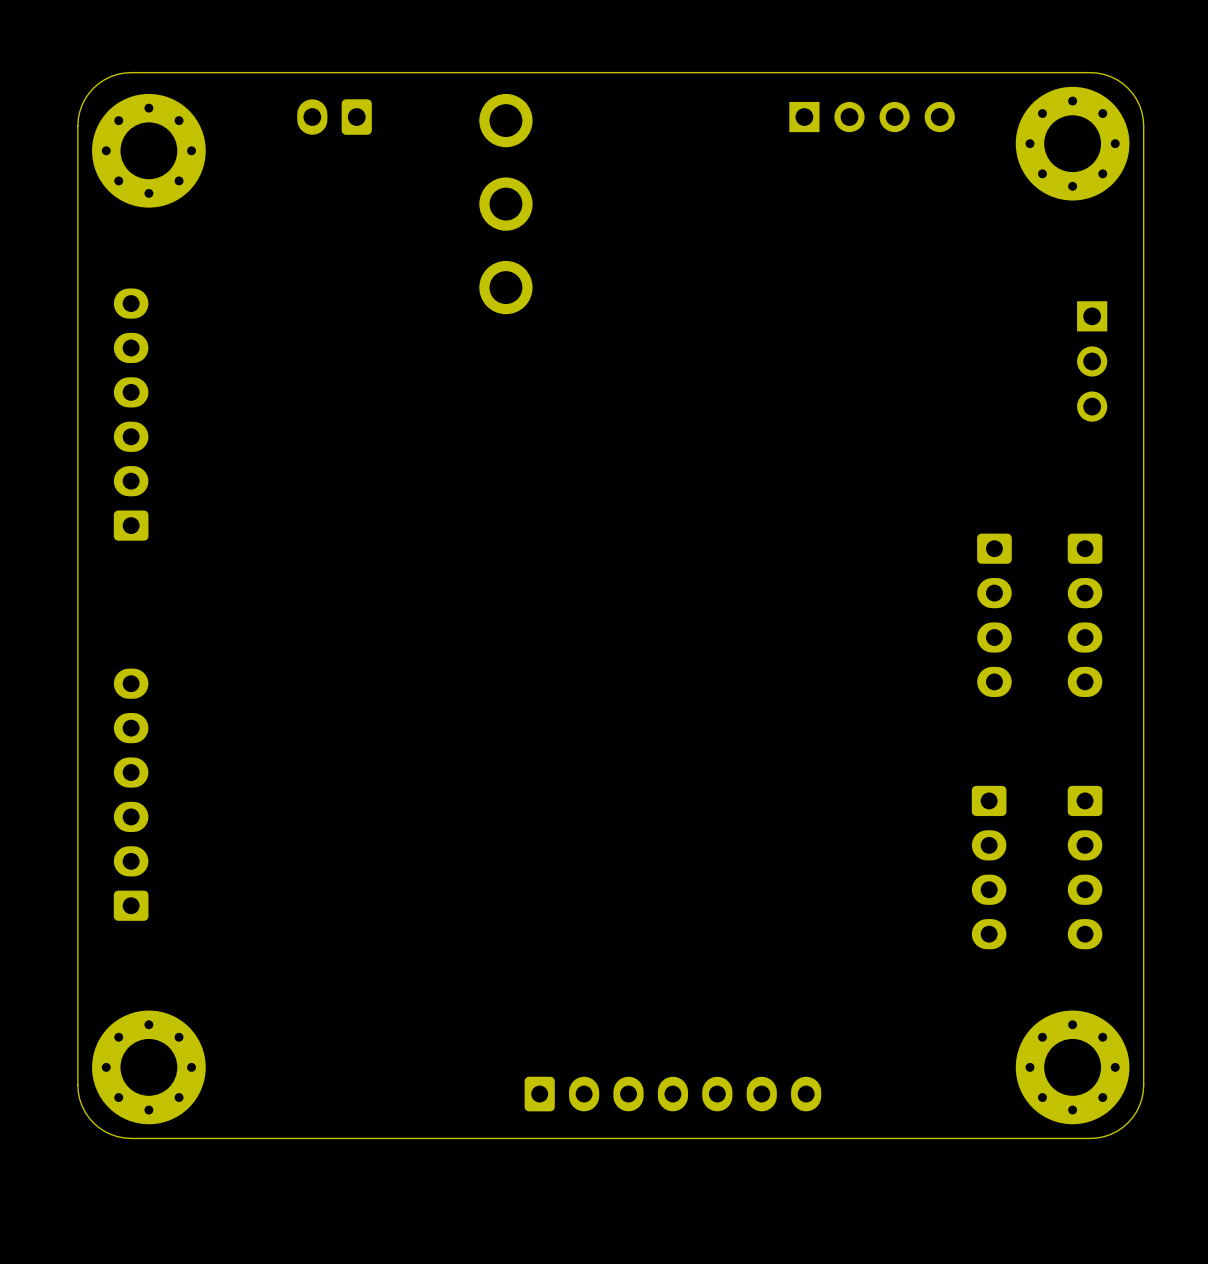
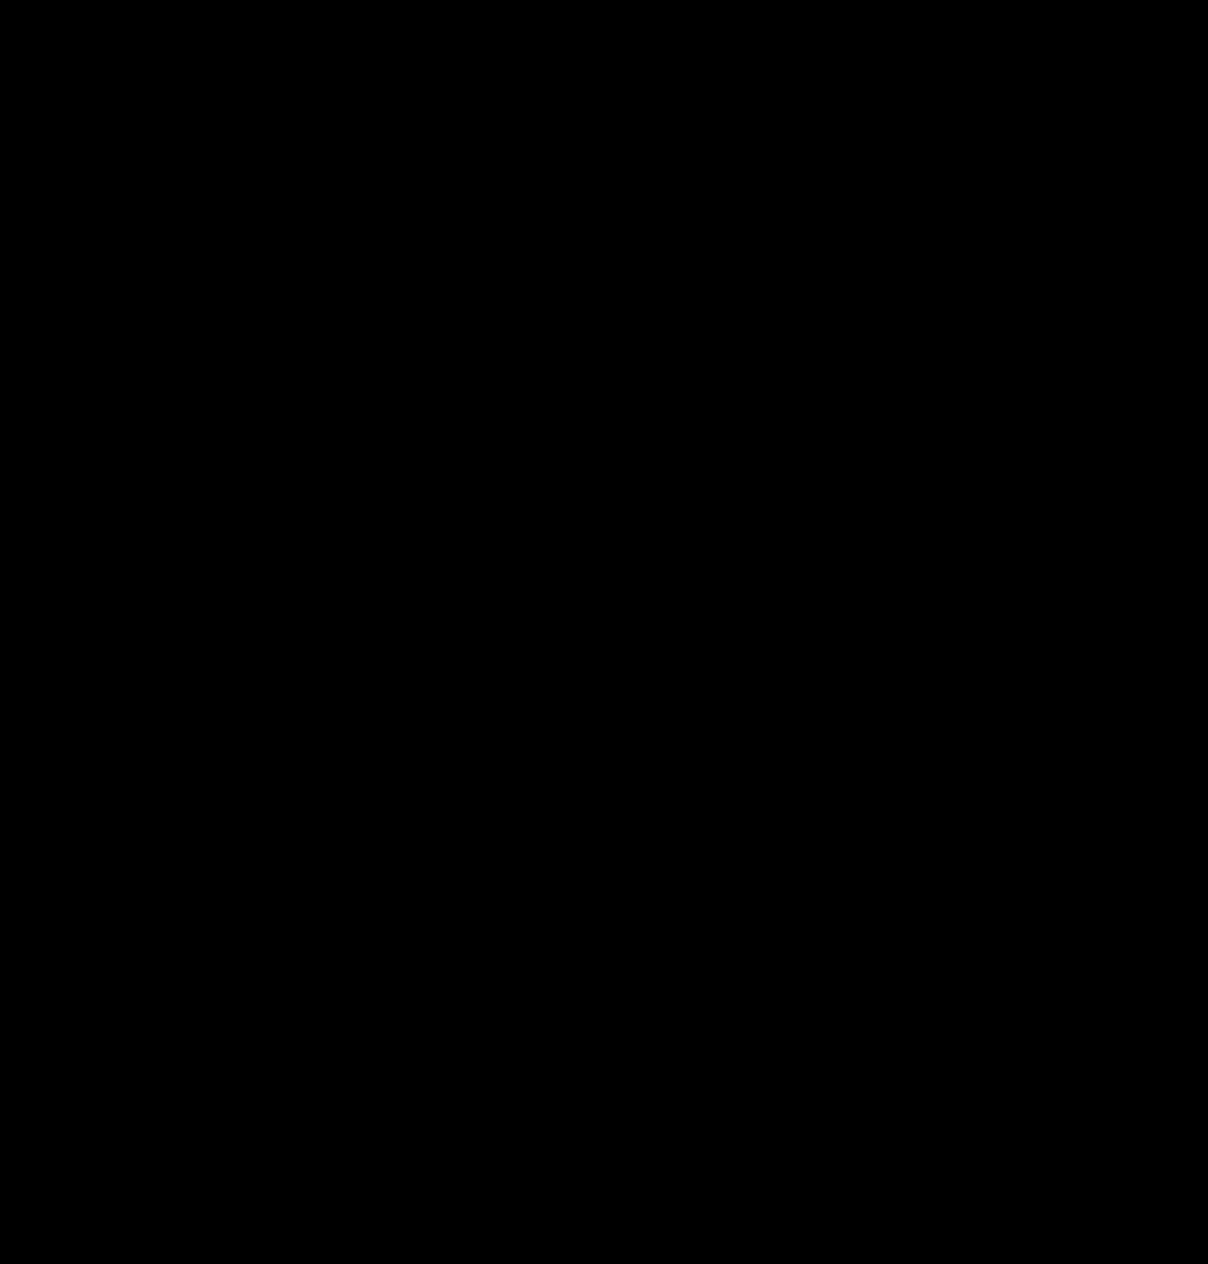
board edge: (1090, 72) (131, 72) (110, 76) (93, 88) (81, 105) (77, 125) (77, 1085) (81, 1105) (93, 1122) (110, 1134) (131, 1138) (1090, 1138) (1110, 1134) (1128, 1122) (1139, 1105) (1143, 1085) (1143, 125) (1139, 105) (1128, 88) (1110, 76) (1090, 72) -> none
part: (334, 117) -> none
part: (872, 117) -> none
part: (1072, 143) -> none
part: (148, 150) -> none
part: (505, 204) -> none
part: (1092, 361) -> none
part: (131, 414) -> none
part: (994, 615) -> none
part: (1085, 615) -> none
part: (131, 794) -> none
part: (989, 867) -> none
part: (1085, 867) -> none
part: (148, 1067) -> none
part: (1072, 1067) -> none
part: (672, 1094) -> none

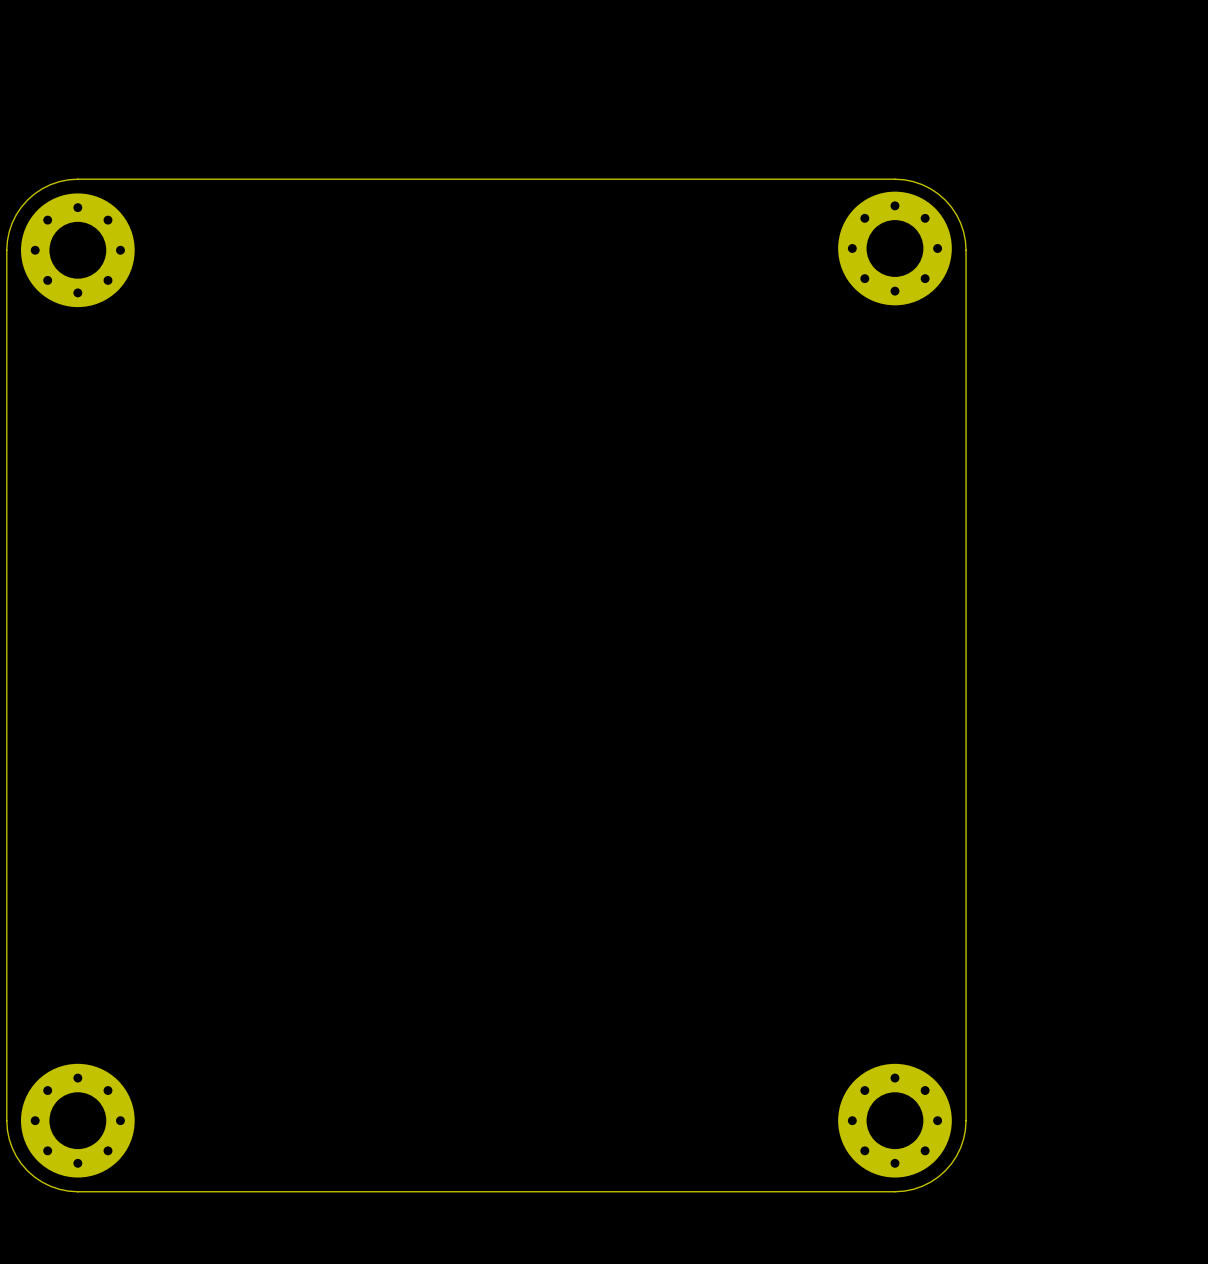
board edge: none -> (894, 179) (77, 179) (59, 181) (42, 188) (21, 207) (9, 231) (6, 250) (6, 1120) (12, 1147) (21, 1163) (34, 1177) (59, 1189) (77, 1191) (894, 1191) (913, 1189) (930, 1182) (951, 1163) (960, 1147) (966, 1120) (966, 250) (960, 223) (945, 200) (922, 184) (894, 179)
part: none -> (894, 248)
part: none -> (77, 250)
part: none -> (77, 1120)
part: none -> (894, 1120)

